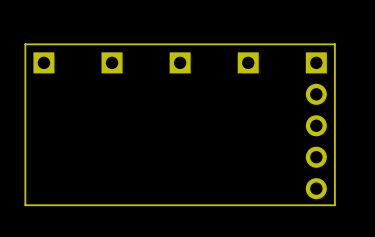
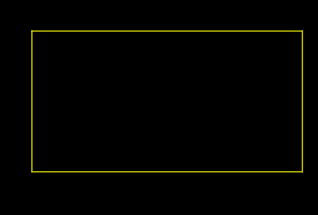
part: (43, 62) -> none
part: (112, 62) -> none
part: (180, 62) -> none
part: (248, 62) -> none
part: (316, 125) -> none

